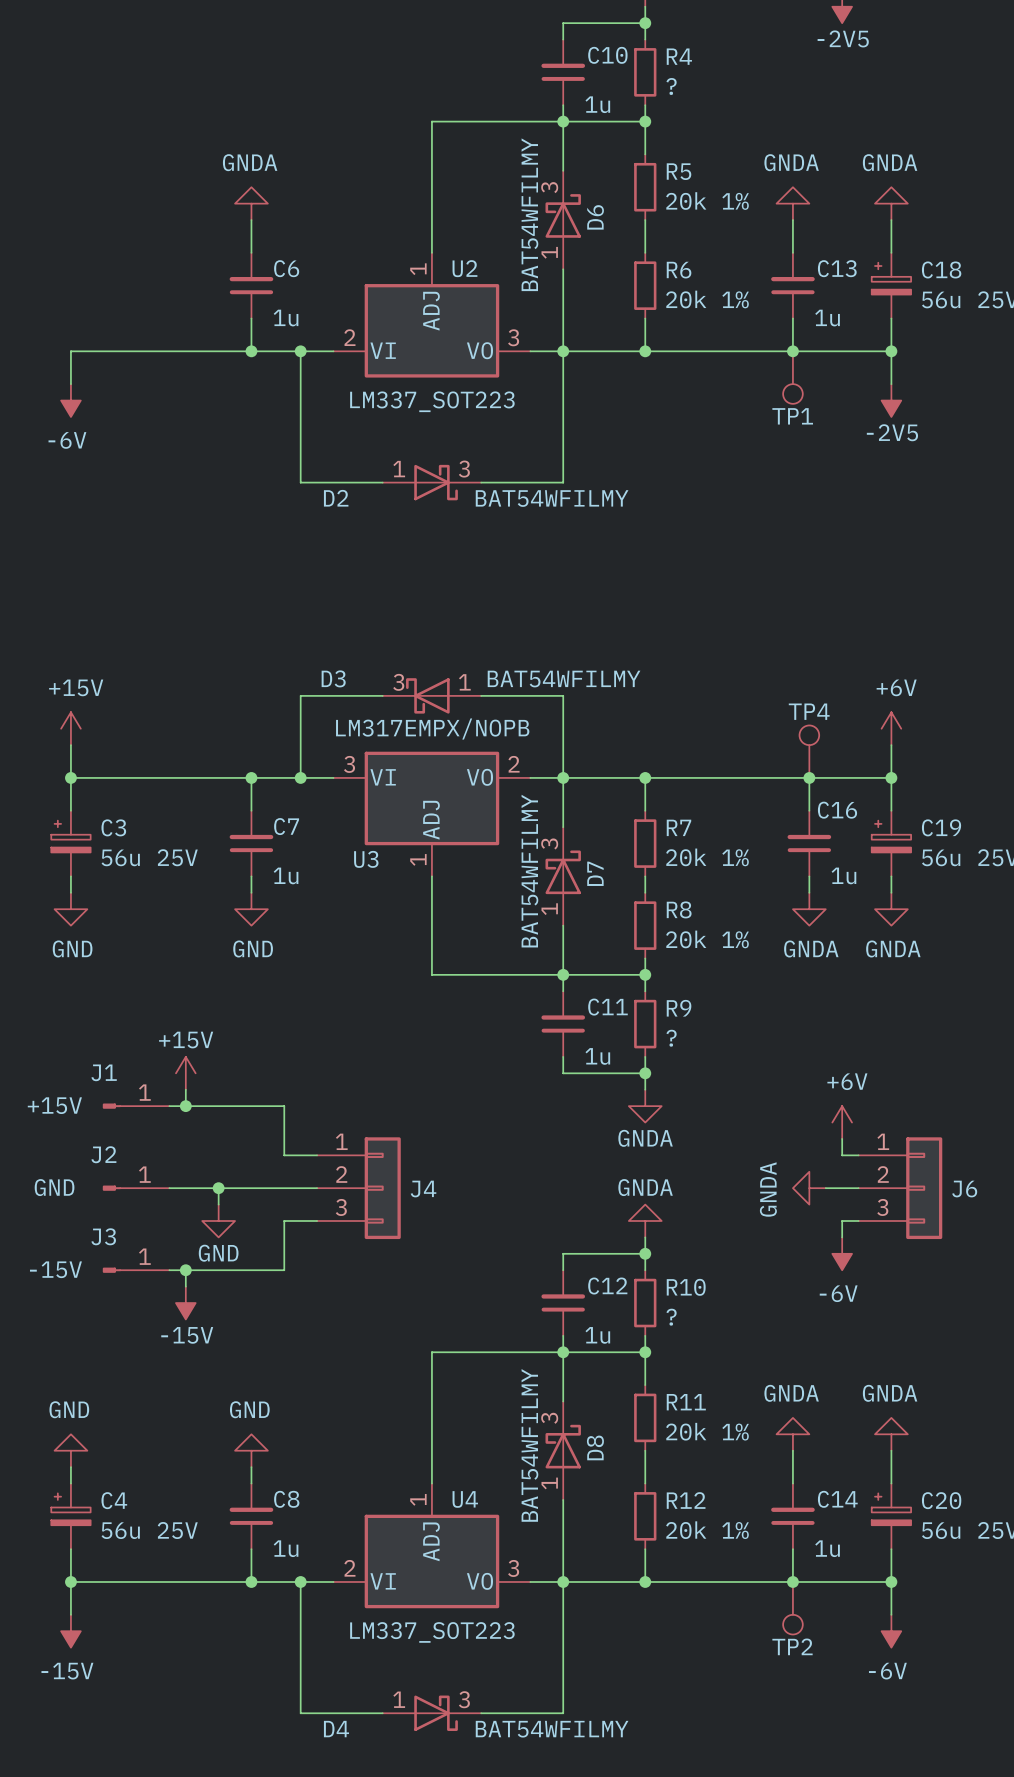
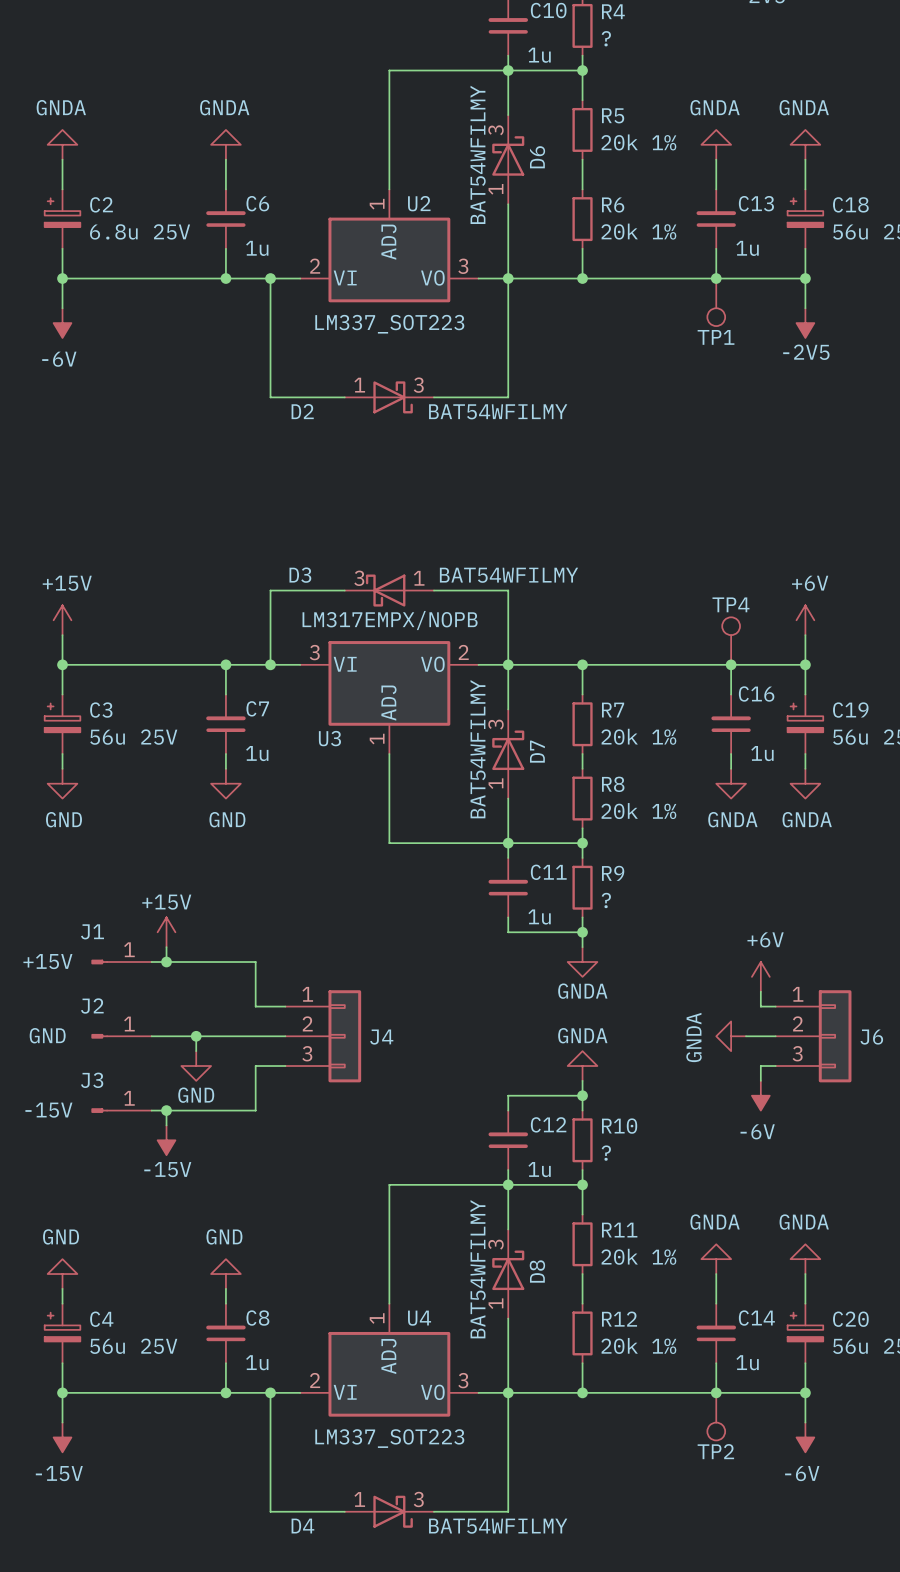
power symbol: none -> GNDA (62, 144)
wire: none -> (62, 159) (62, 189)
C2: none -> 6.8u 25V (62, 219)
wire: none -> (62, 248) (62, 278)
junction: none -> (62, 278)

